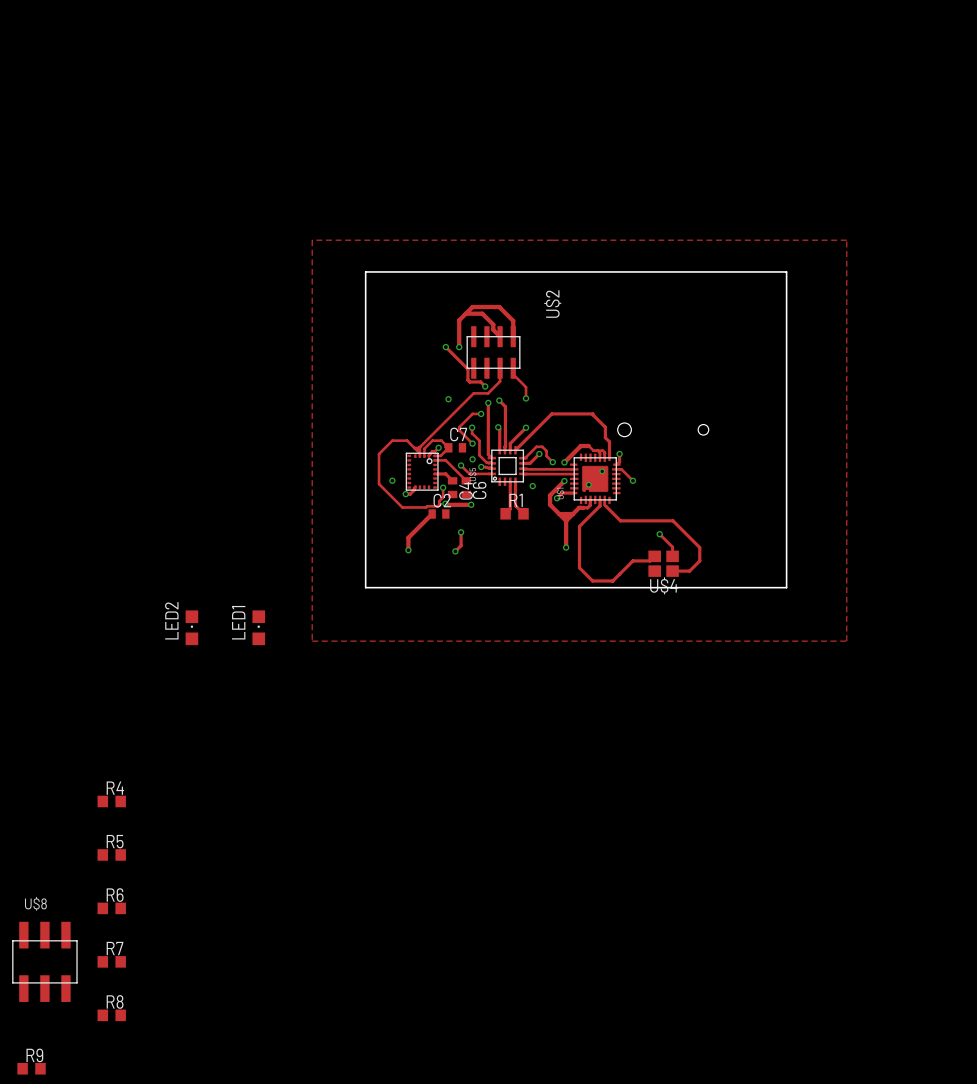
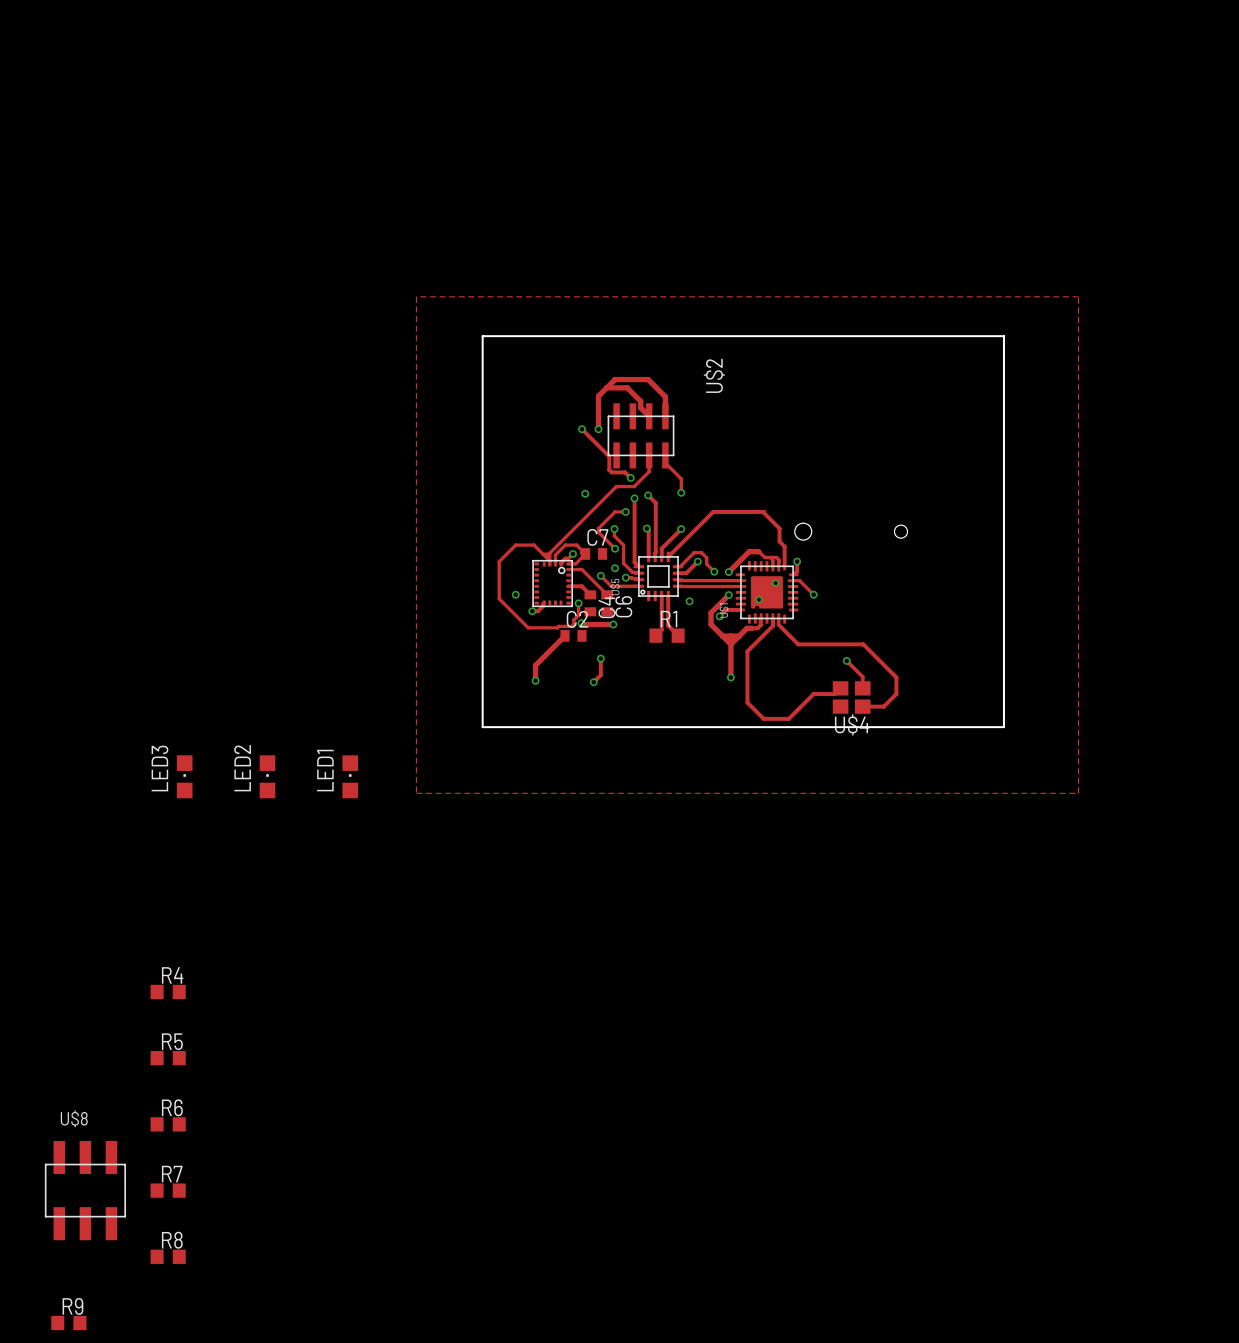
LED3: none -> (184, 776)

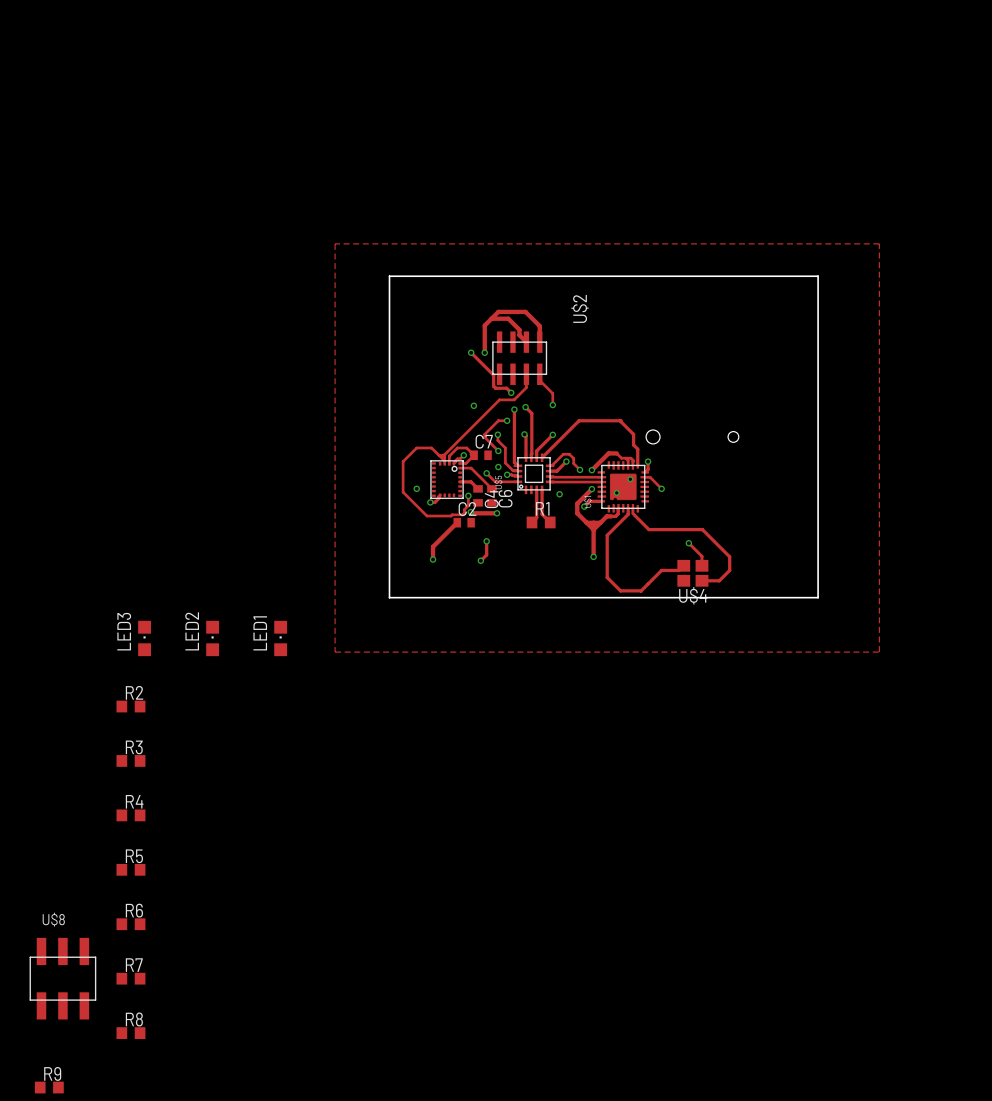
R2: none -> (130, 706)
R3: none -> (130, 760)

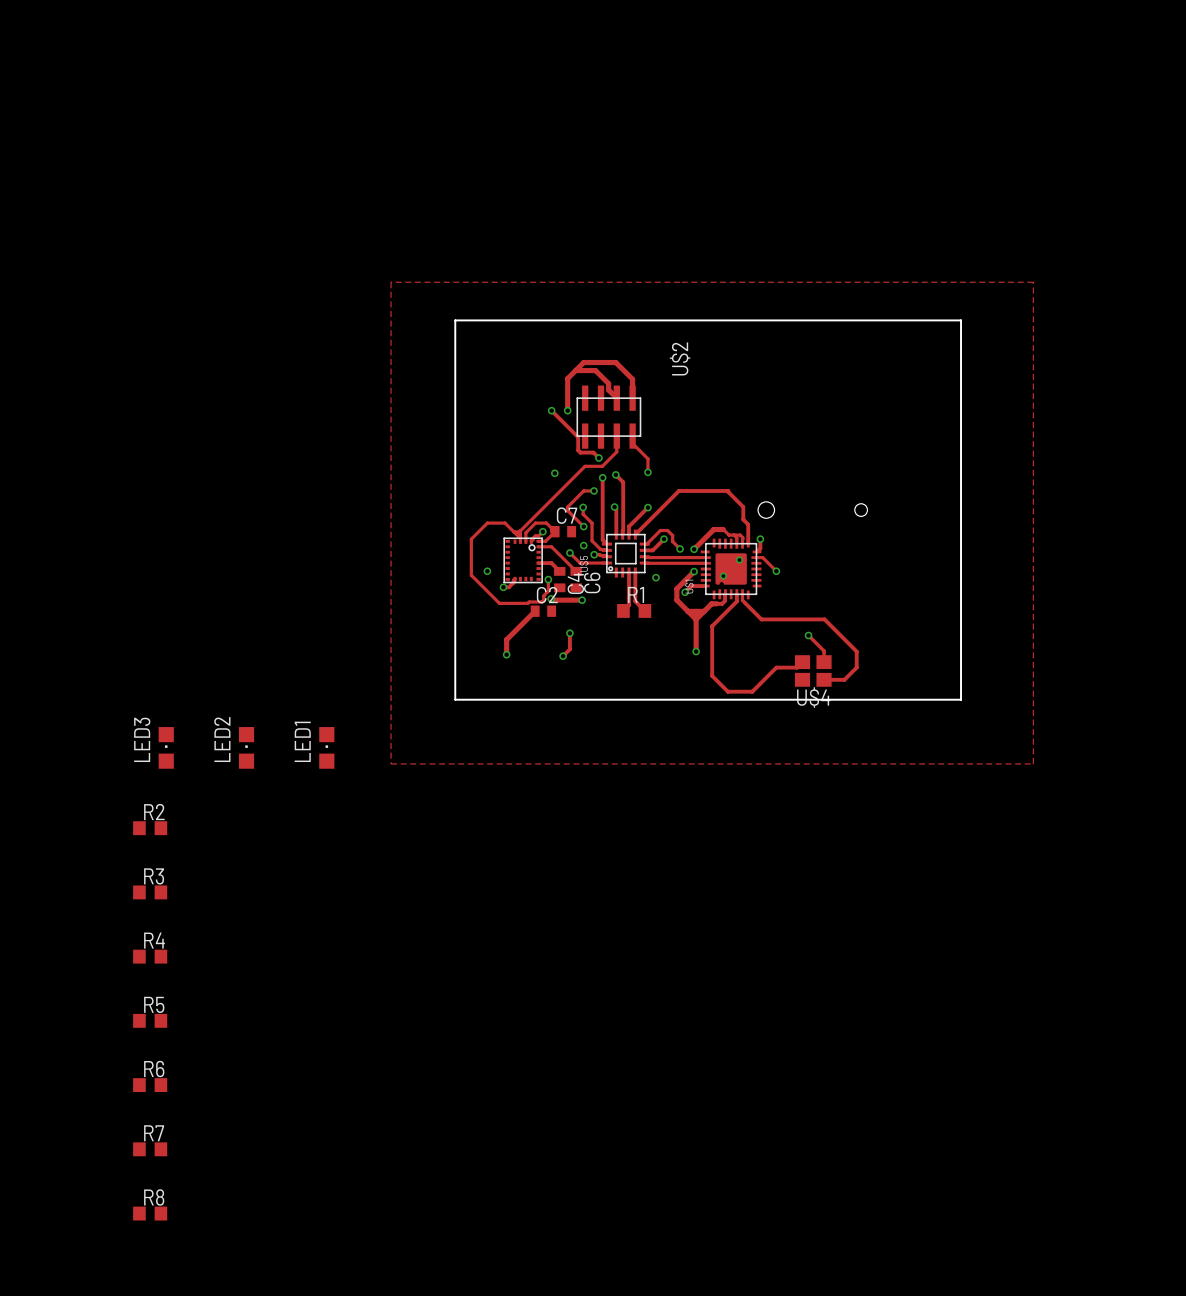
U$8: (62, 978) -> none
R9: (49, 1087) -> none

